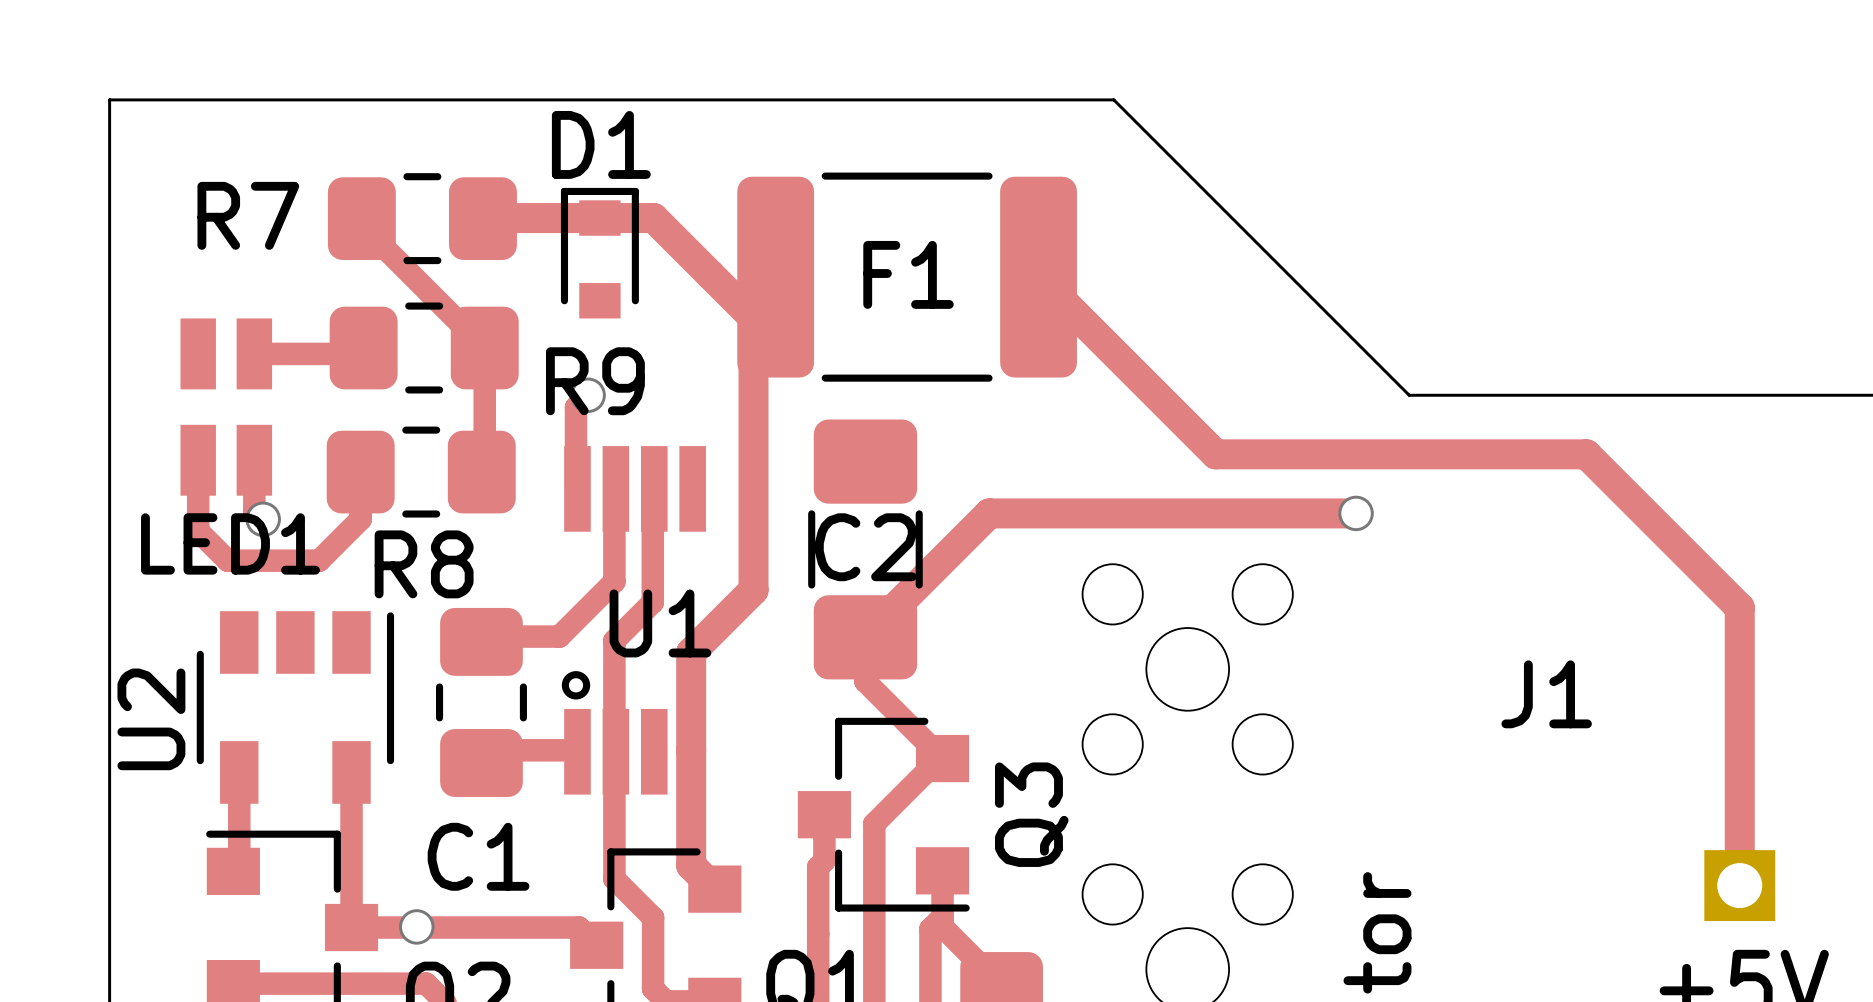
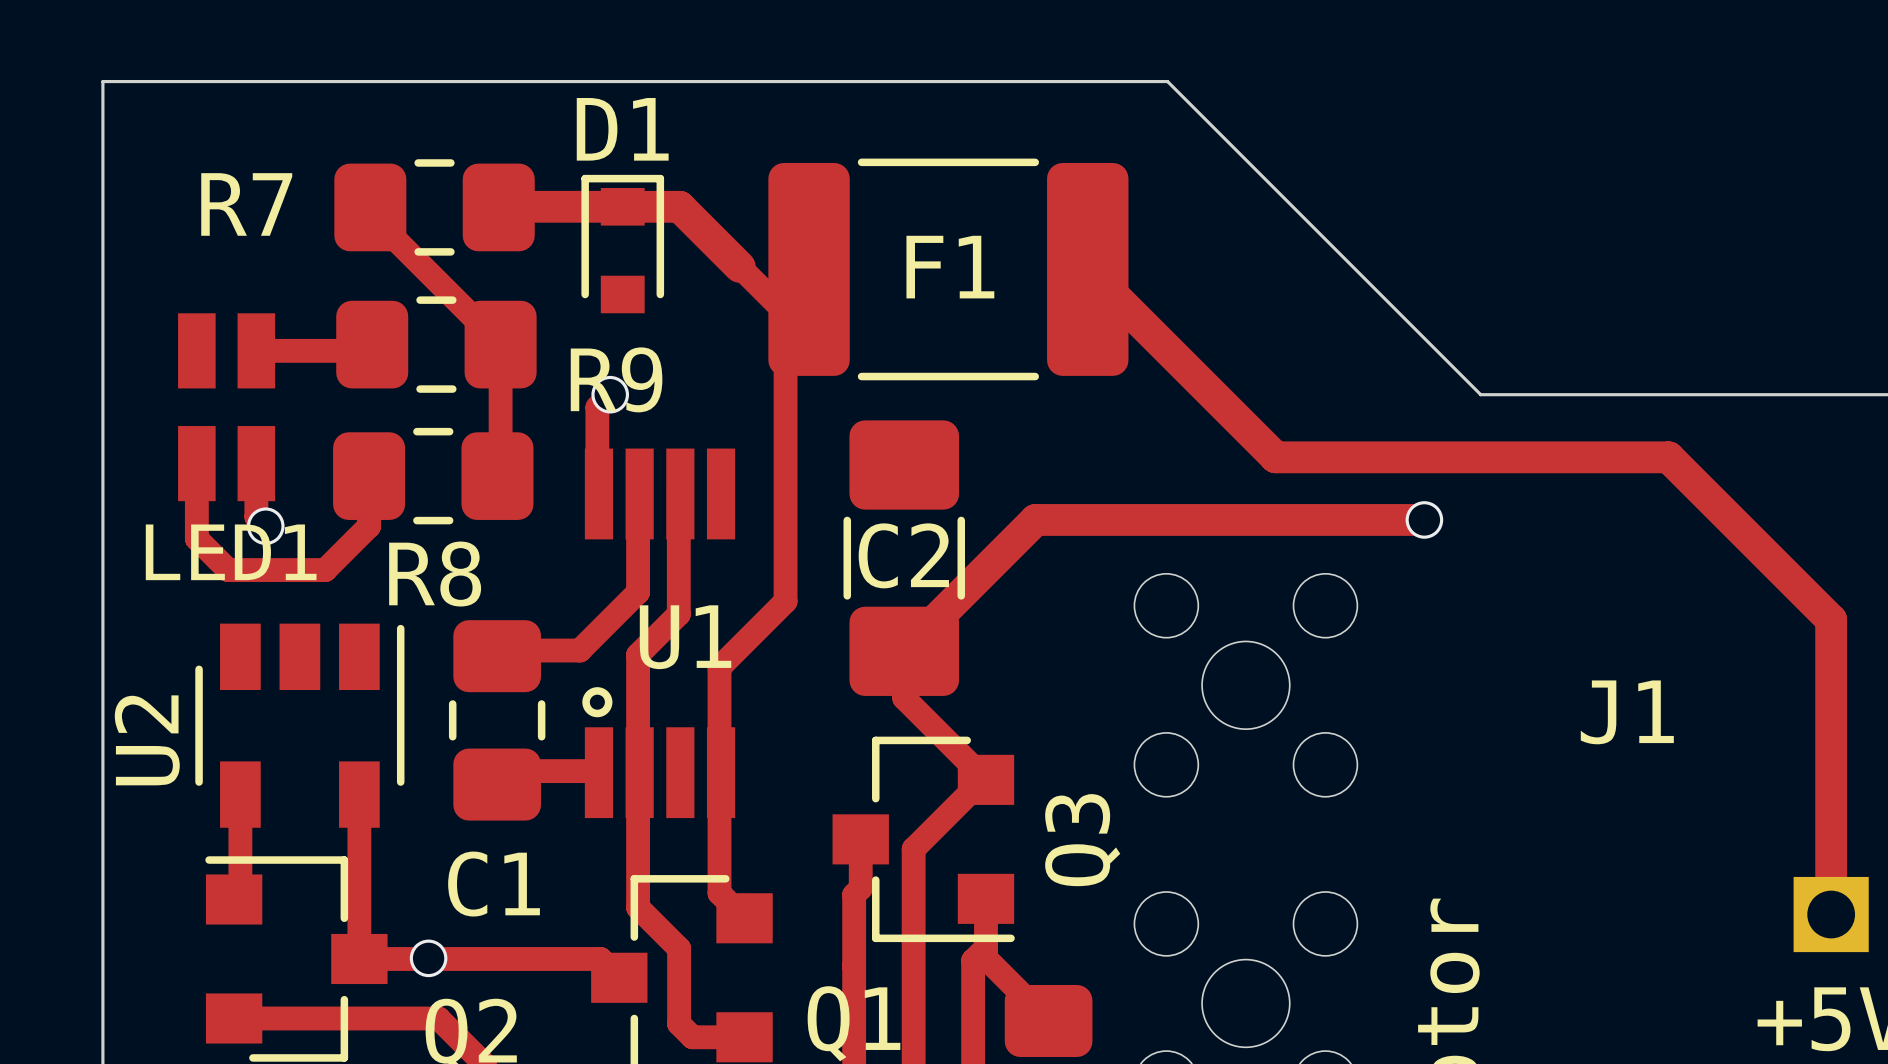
track width: thick (710, 274) (753, 317) (753, 590) (691, 652) (691, 865) (714, 889) -> thin (739, 266) (785, 312) (785, 601) (719, 667) (719, 893) (744, 918)

